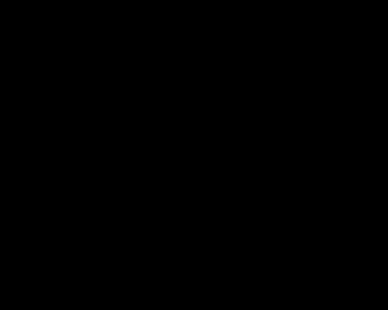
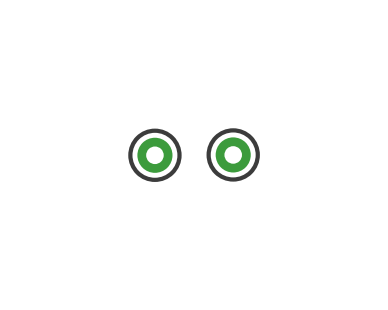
part: none -> (233, 154)
part: none -> (154, 155)

